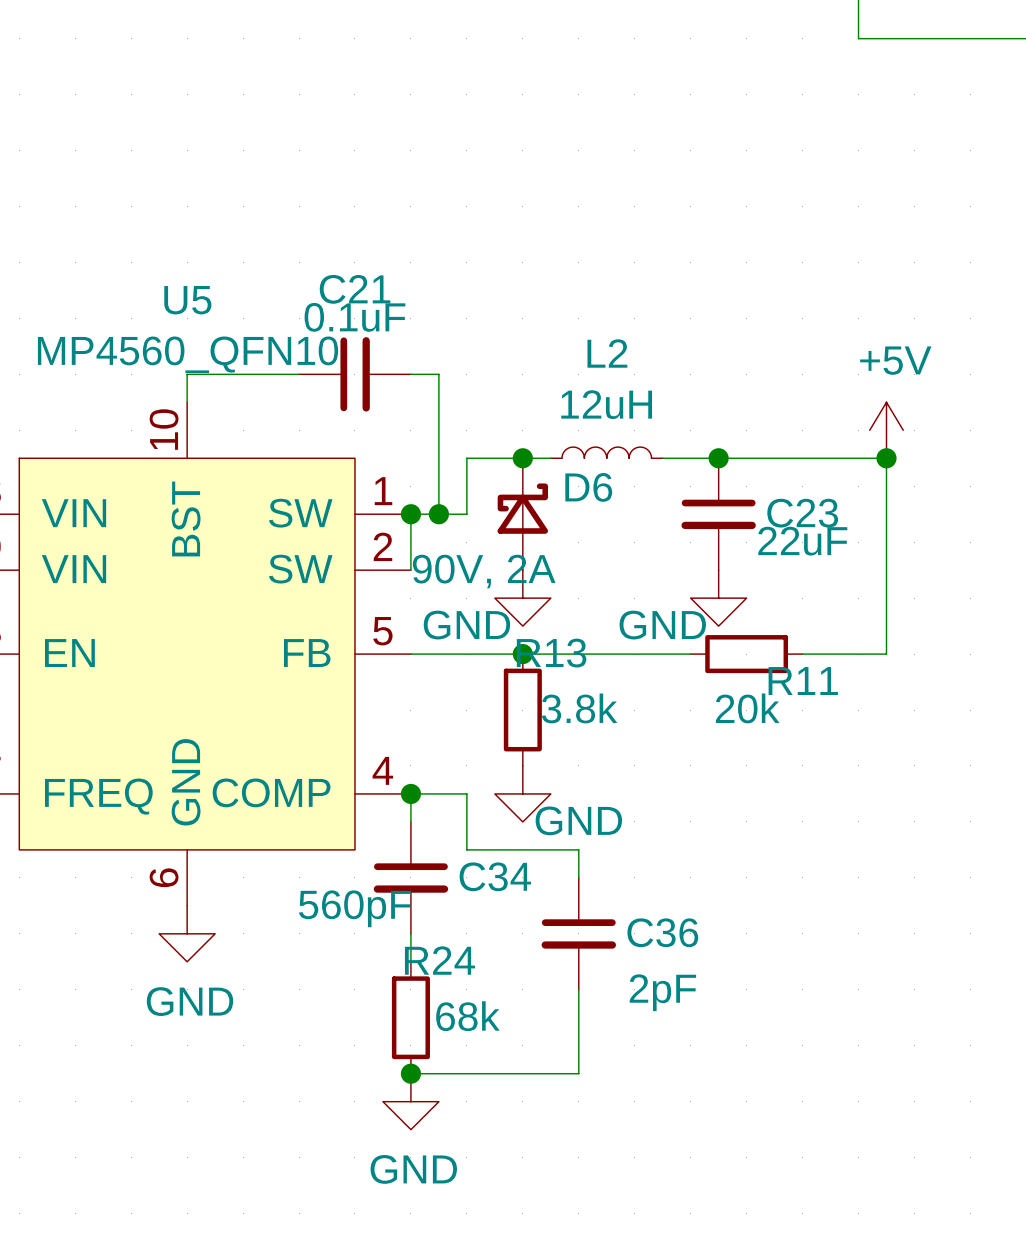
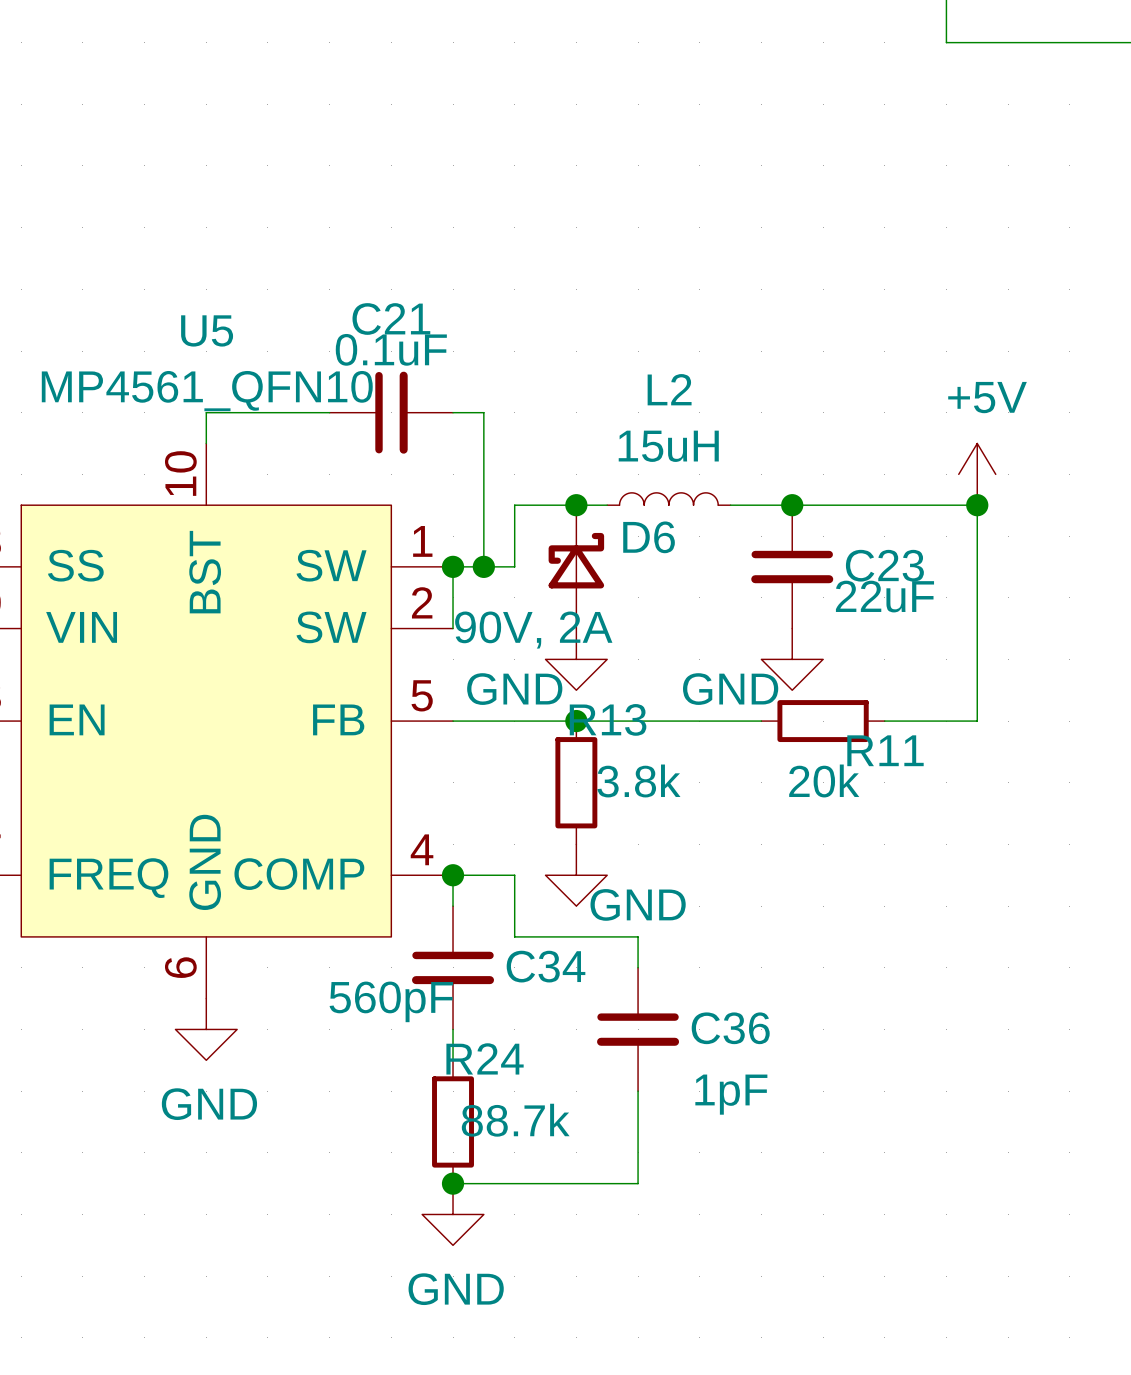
U5 value: MP4560_QFN10 (188, 354) -> MP4561_QFN10 (207, 391)
L2 value: 12uH (606, 404) -> 15uH (668, 446)
U5 pin name: VIN (74, 513) -> SS (75, 565)
C36 value: 2pF (662, 992) -> 1pF (731, 1094)
R24 value: 68k (467, 1016) -> 88.7k (515, 1120)

